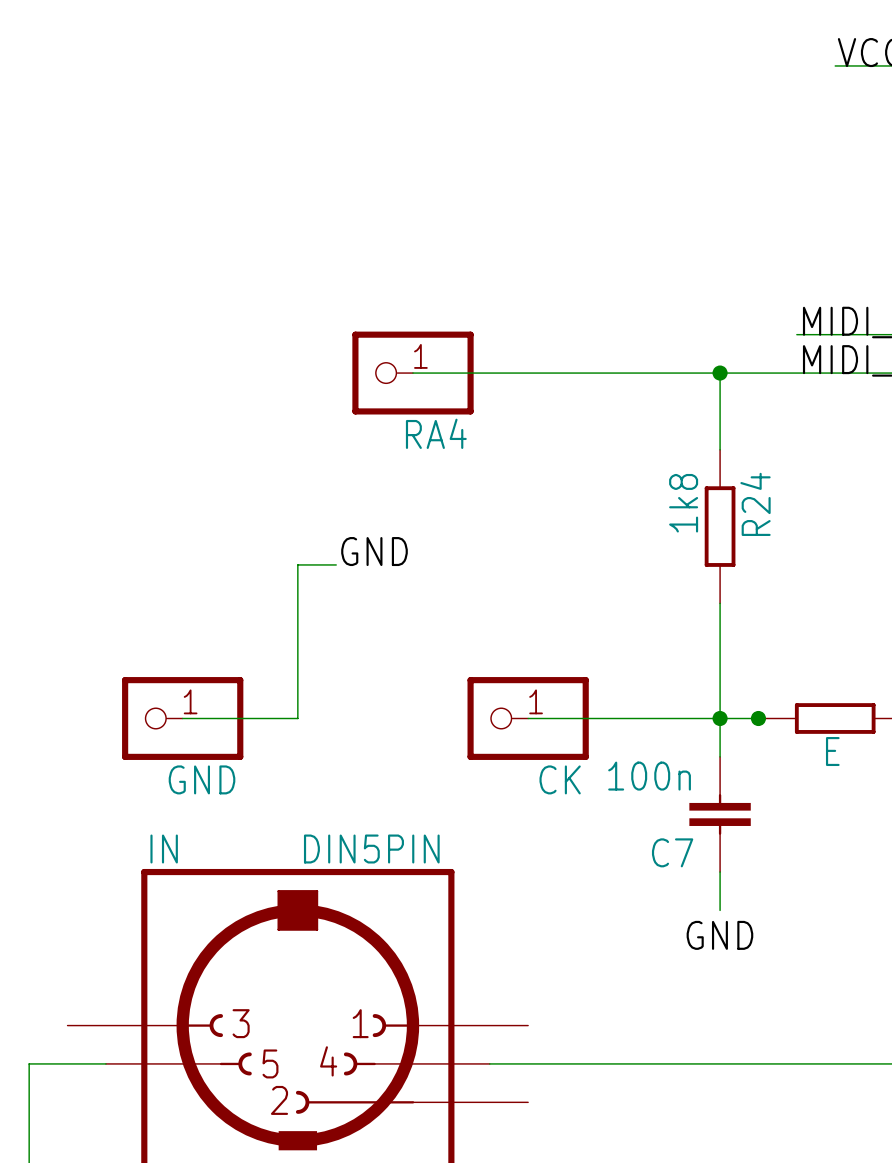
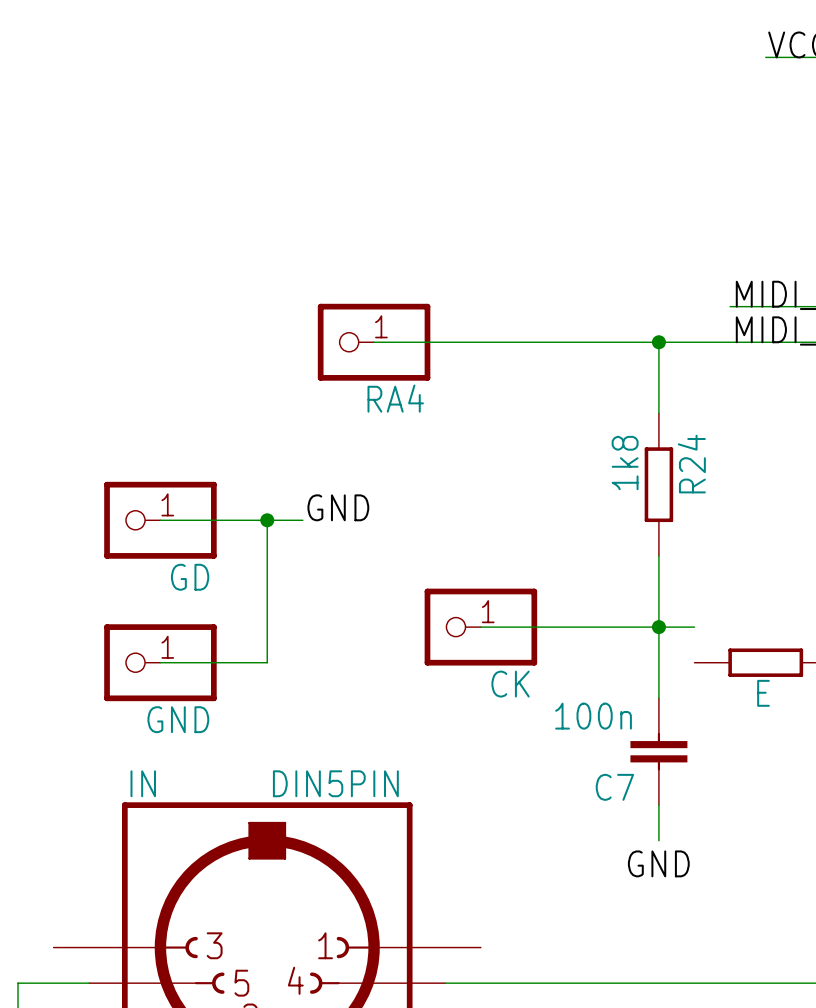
wire: none -> (160, 520) (267, 520)
GD: none -> (160, 520)
junction: none -> (267, 520)
junction: none -> (658, 627)
wire: (528, 718) (758, 718) -> (480, 627) (694, 627)
CK position: (528, 718) -> (480, 627)
junction: (720, 718) -> none
junction: (758, 718) -> none

